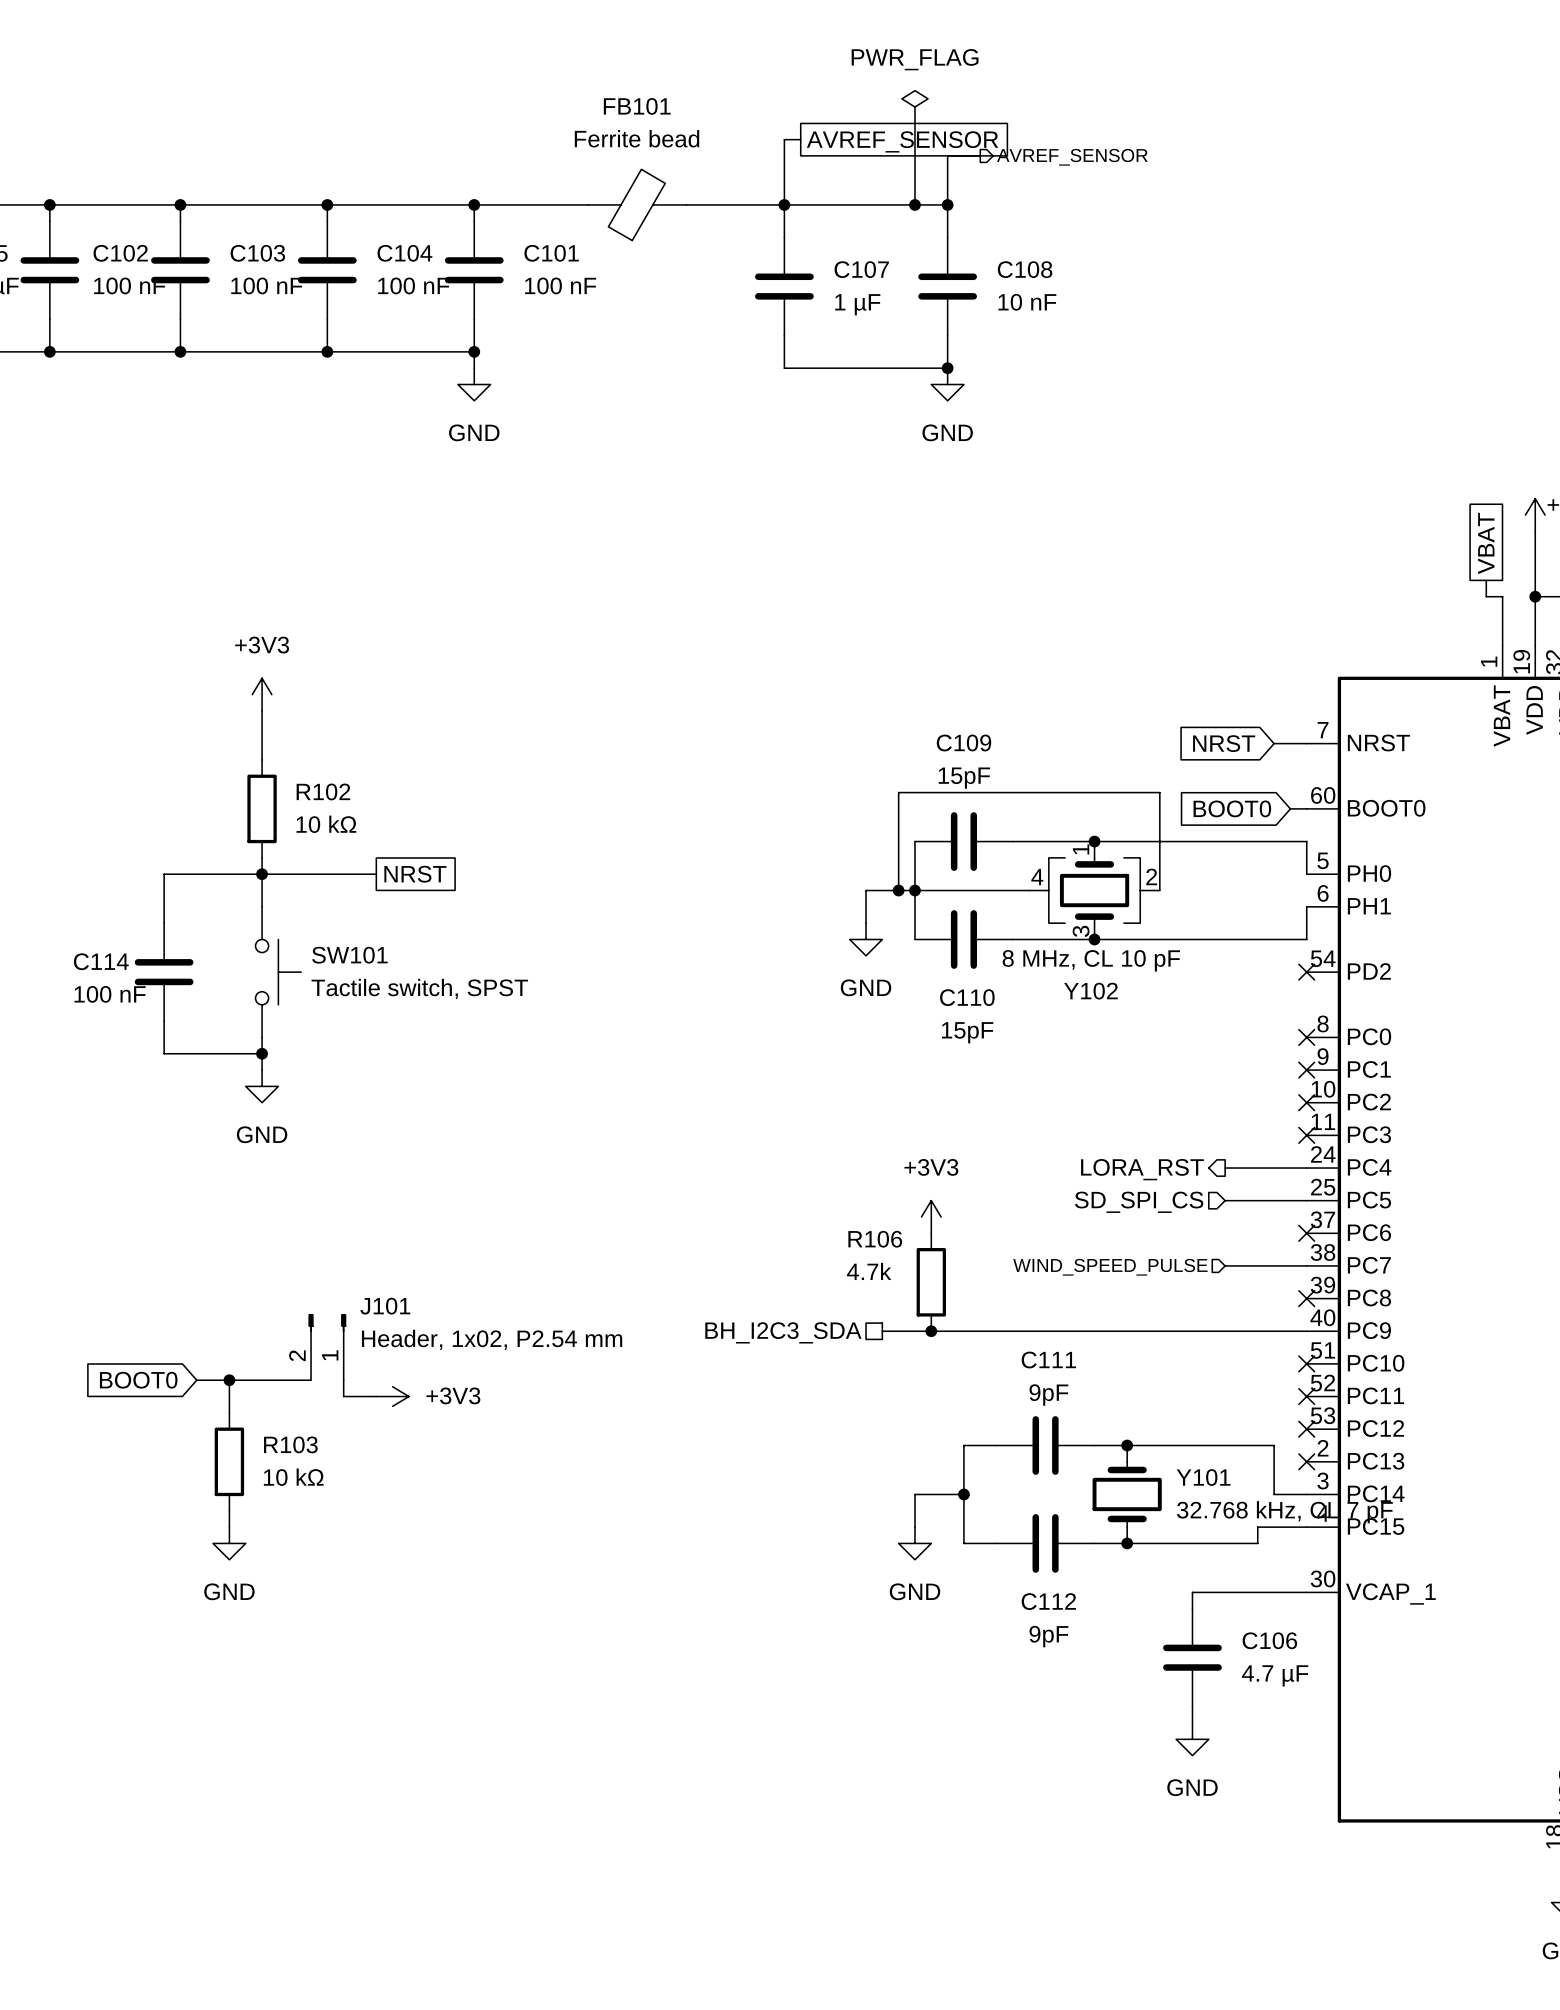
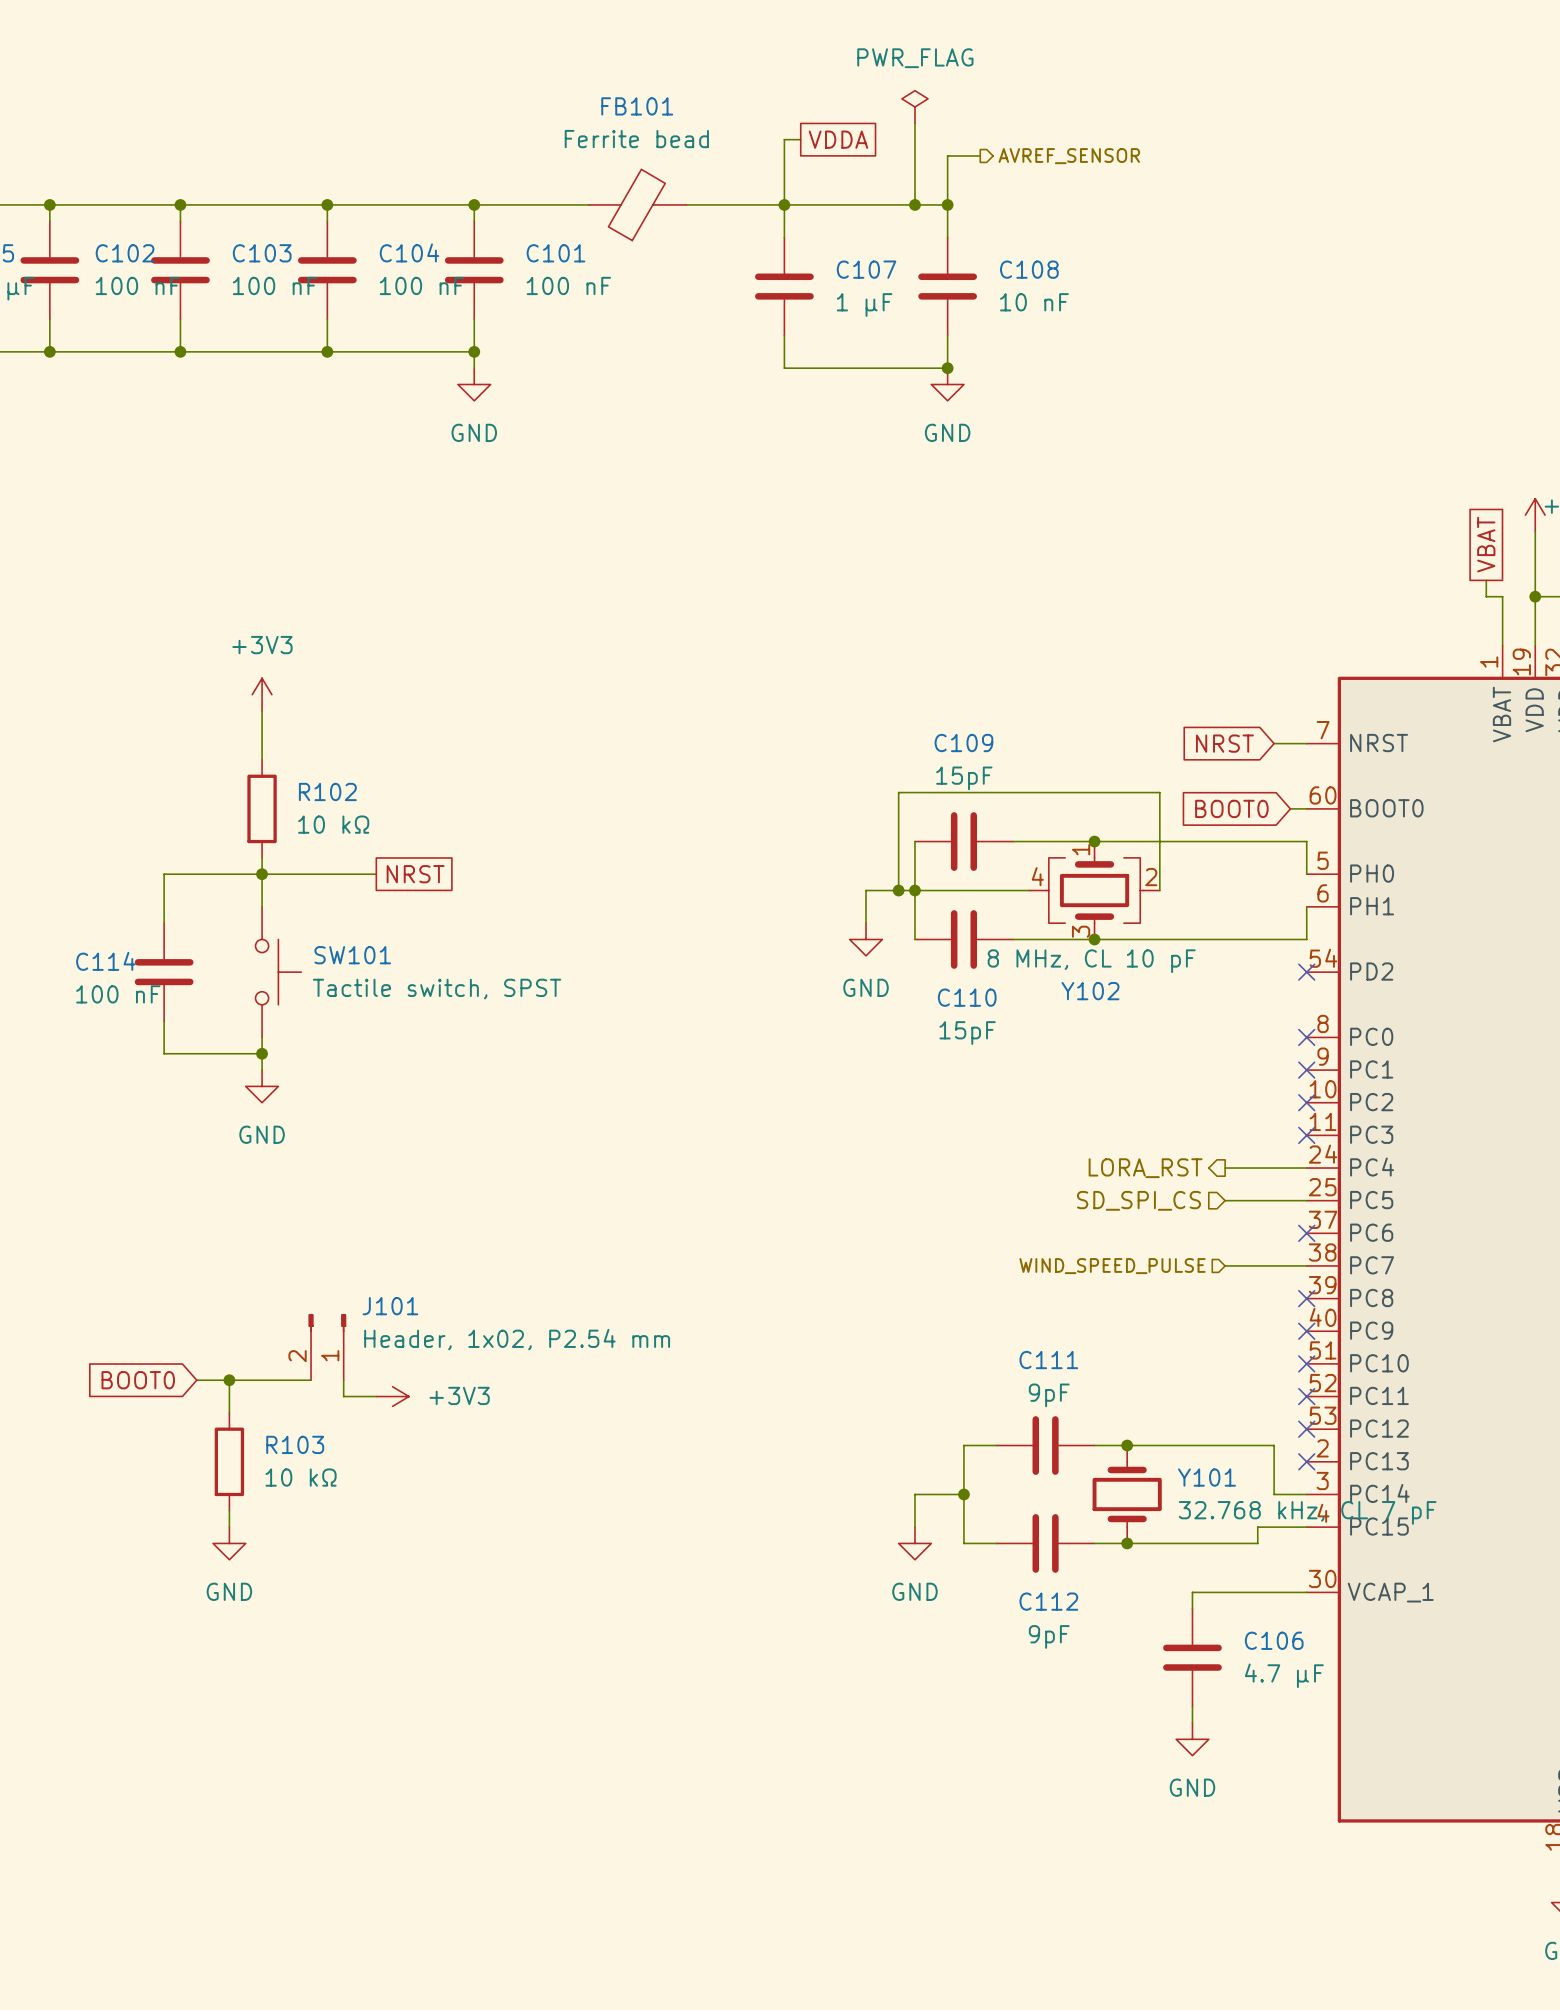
global label: AVREF_SENSOR (902, 141) -> VDDA (838, 139)
power symbol: +3V3 (931, 1216) -> none
R106: 4.7k (931, 1282) -> none
wire: (882, 1331) (1306, 1331) -> none
junction: (931, 1331) -> none
no-connect mark: none -> (1306, 1331)
hierarchical label: BH_I2C3_SDA (783, 1332) -> none

